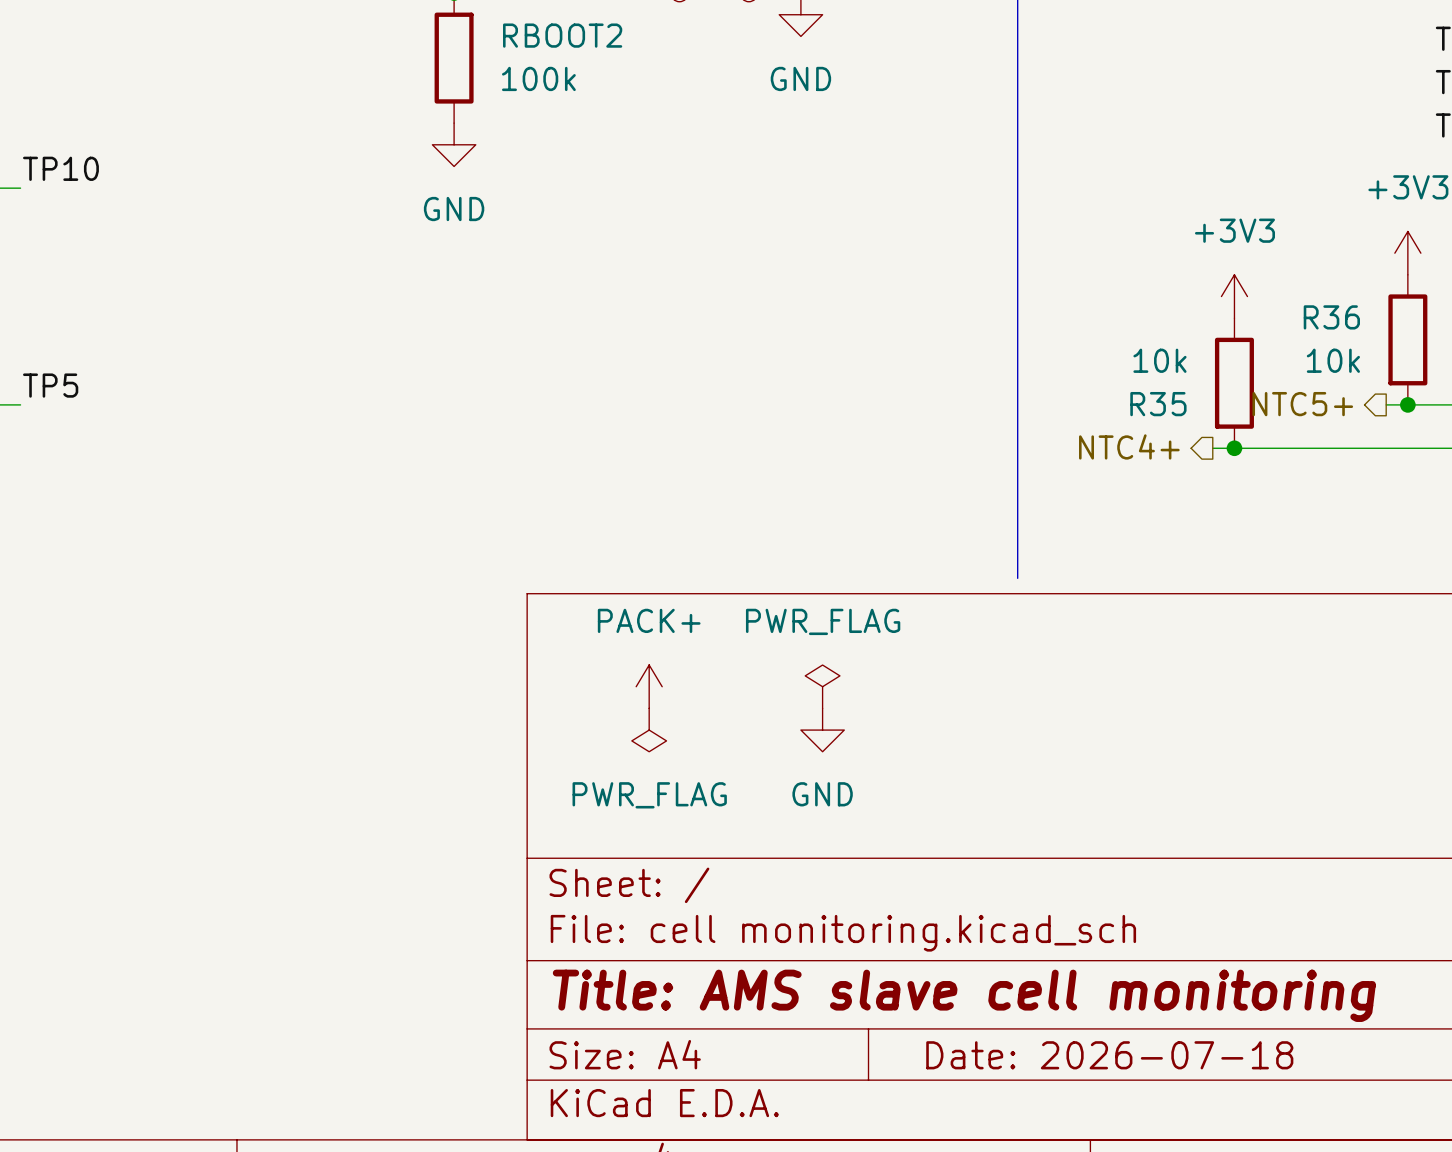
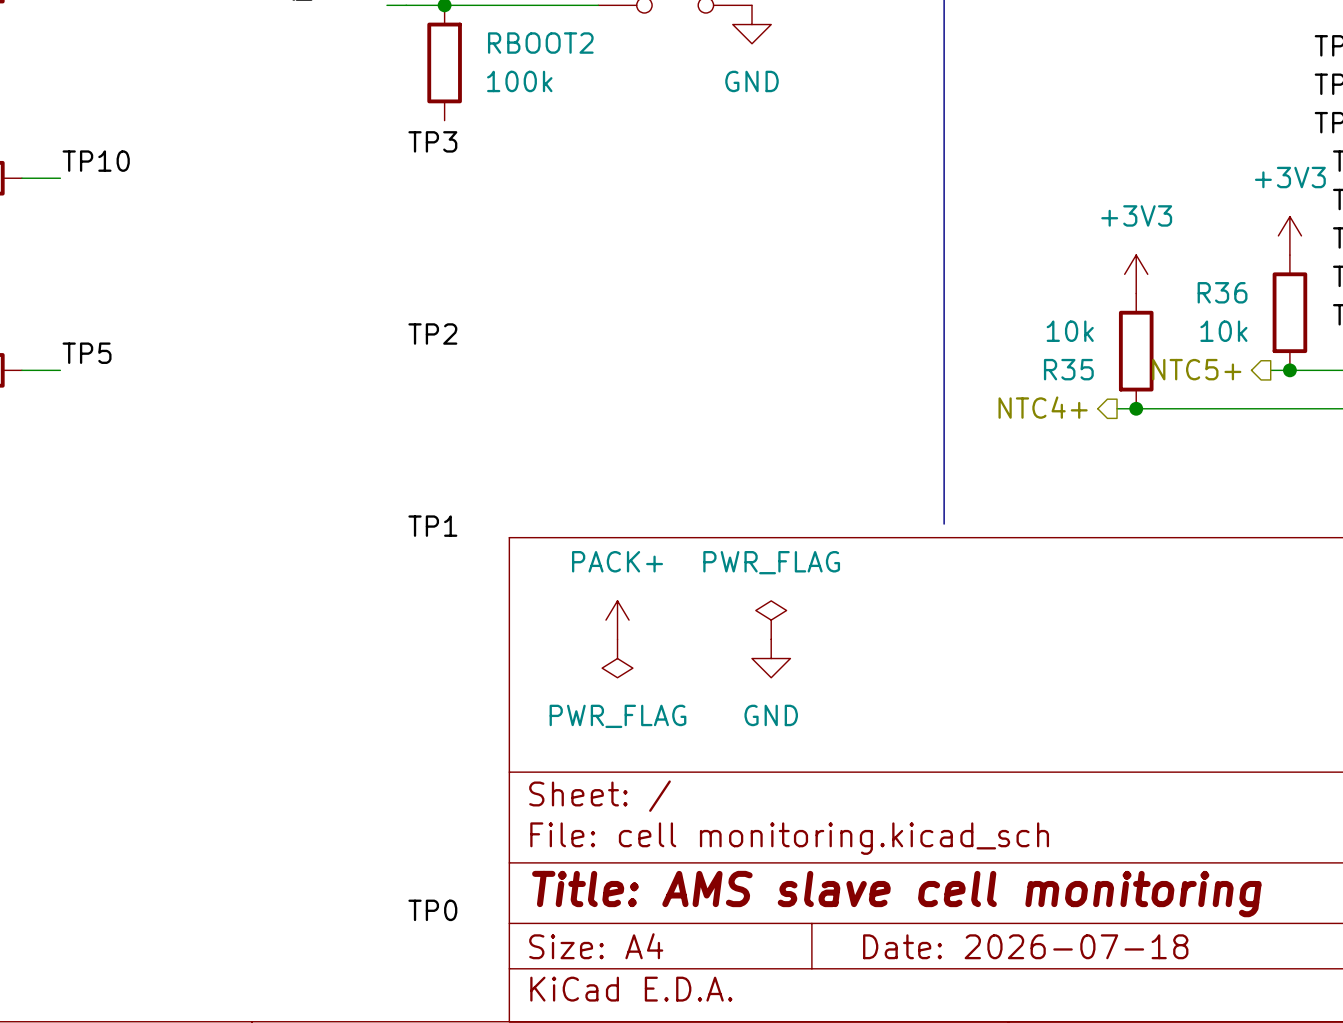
power symbol: GND (454, 144) -> none
label: none -> TP3 (432, 141)
label: none -> TP2 (432, 334)
label: none -> TP1 (432, 526)
label: none -> TP0 (432, 910)

